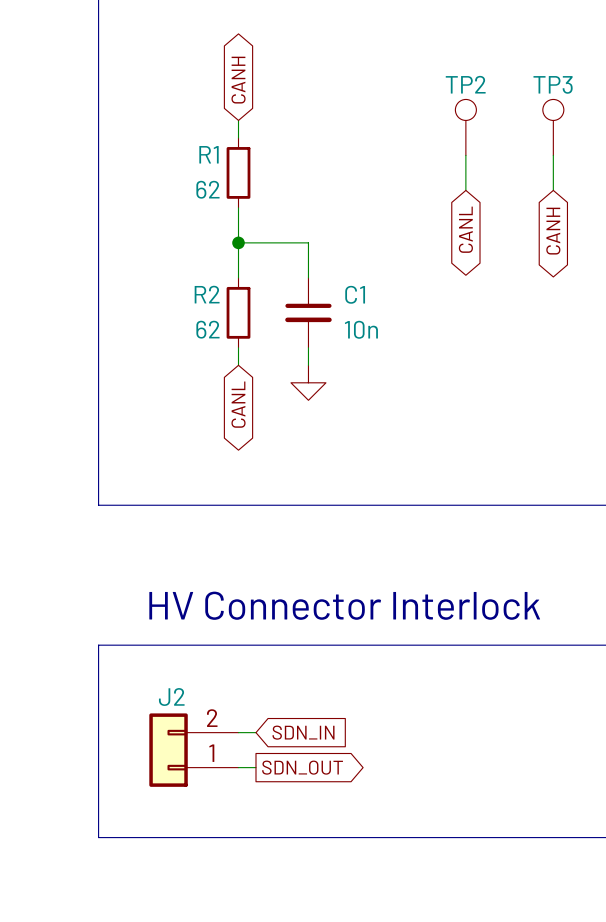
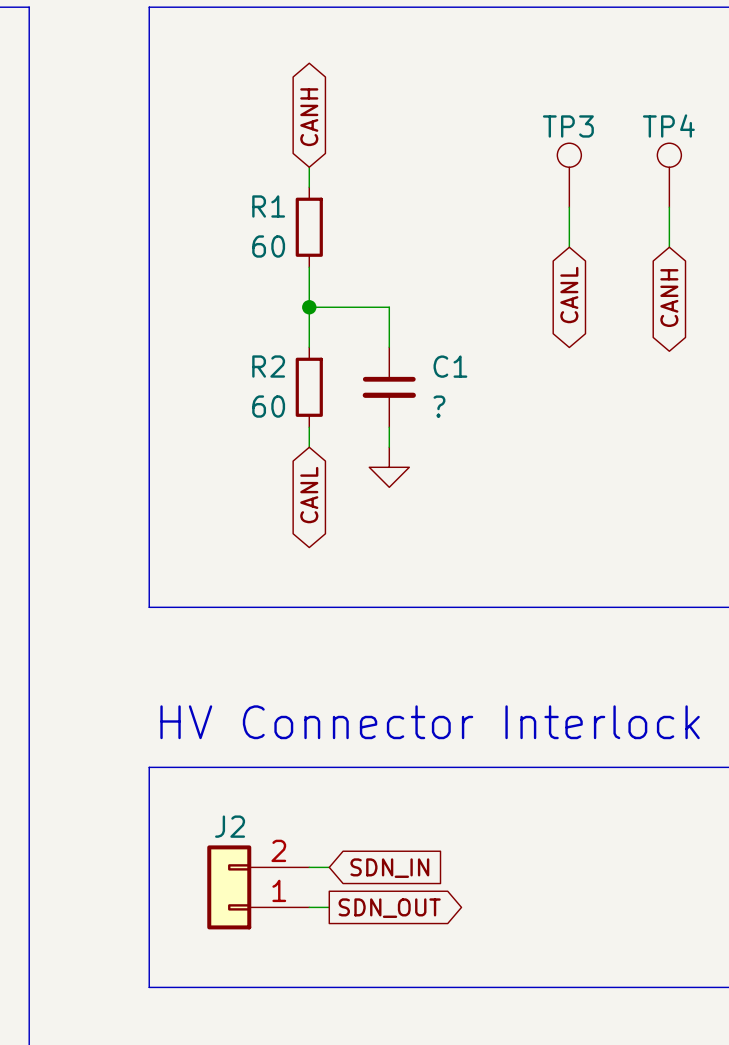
TP2 name: TP2 (465, 84) -> TP3 (568, 126)
TP3 name: TP3 (553, 84) -> TP4 (668, 125)
R1 value: 62 (207, 189) -> 60 (268, 246)
R2 value: 62 (207, 329) -> 60 (268, 406)
C1 value: 10n (361, 329) -> ? (439, 406)

